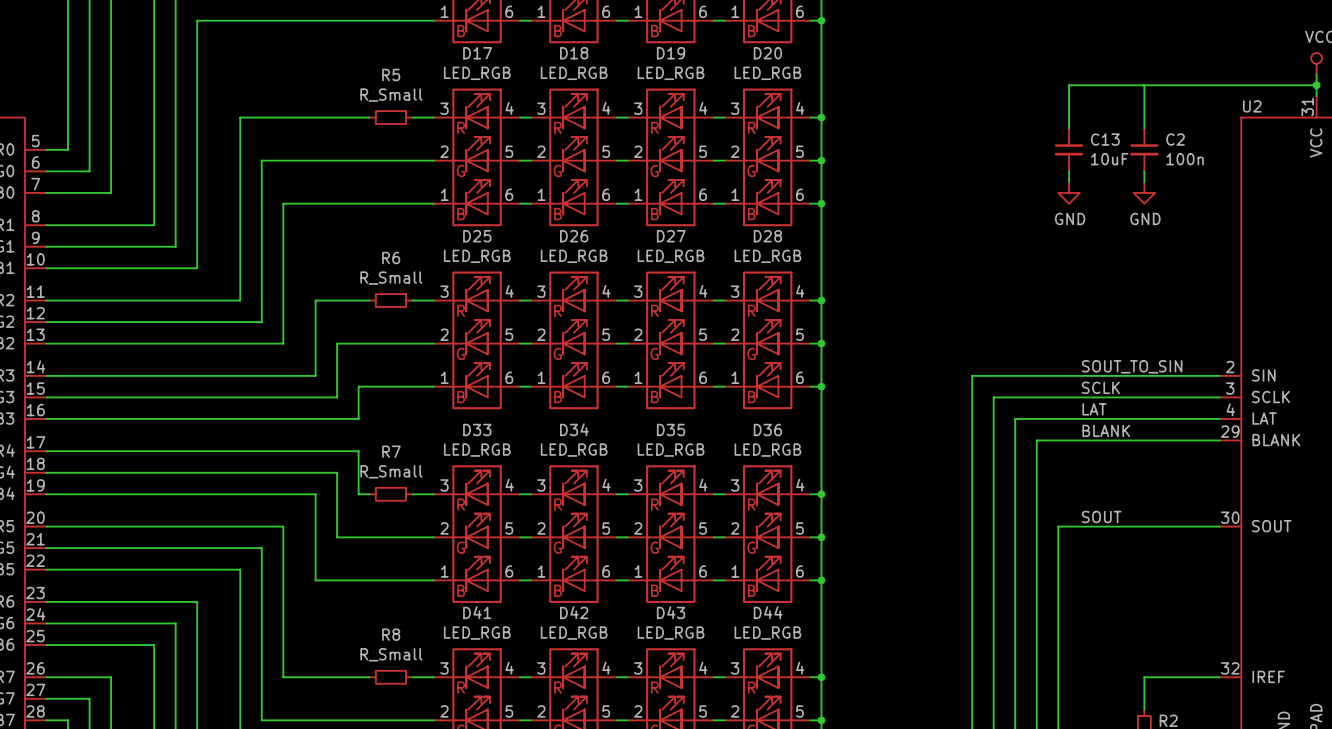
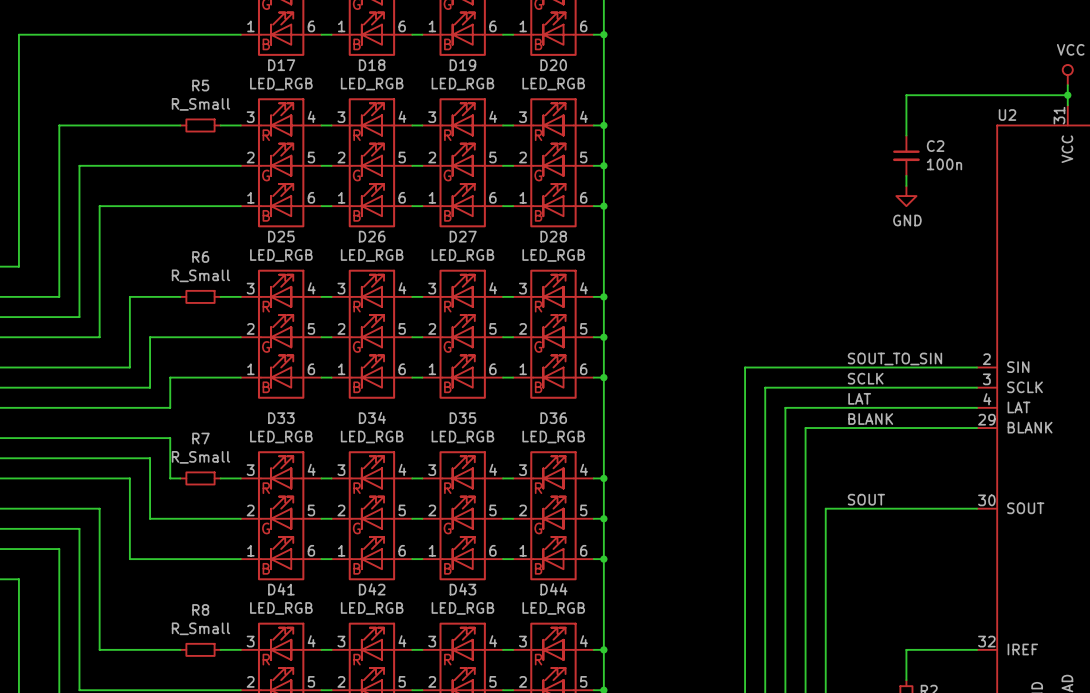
wire: (1144, 85) (1069, 85) (1069, 128) -> none
C13: 10uF (1069, 149) -> none
wire: (1069, 171) (1069, 182) -> none
power symbol: GND (1069, 192) -> none

